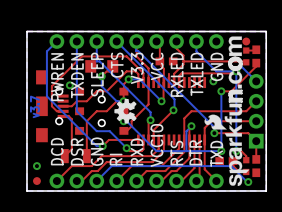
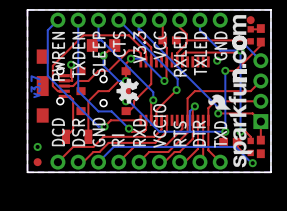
top track: none -> (71, 64) (72, 80) (64, 80)

